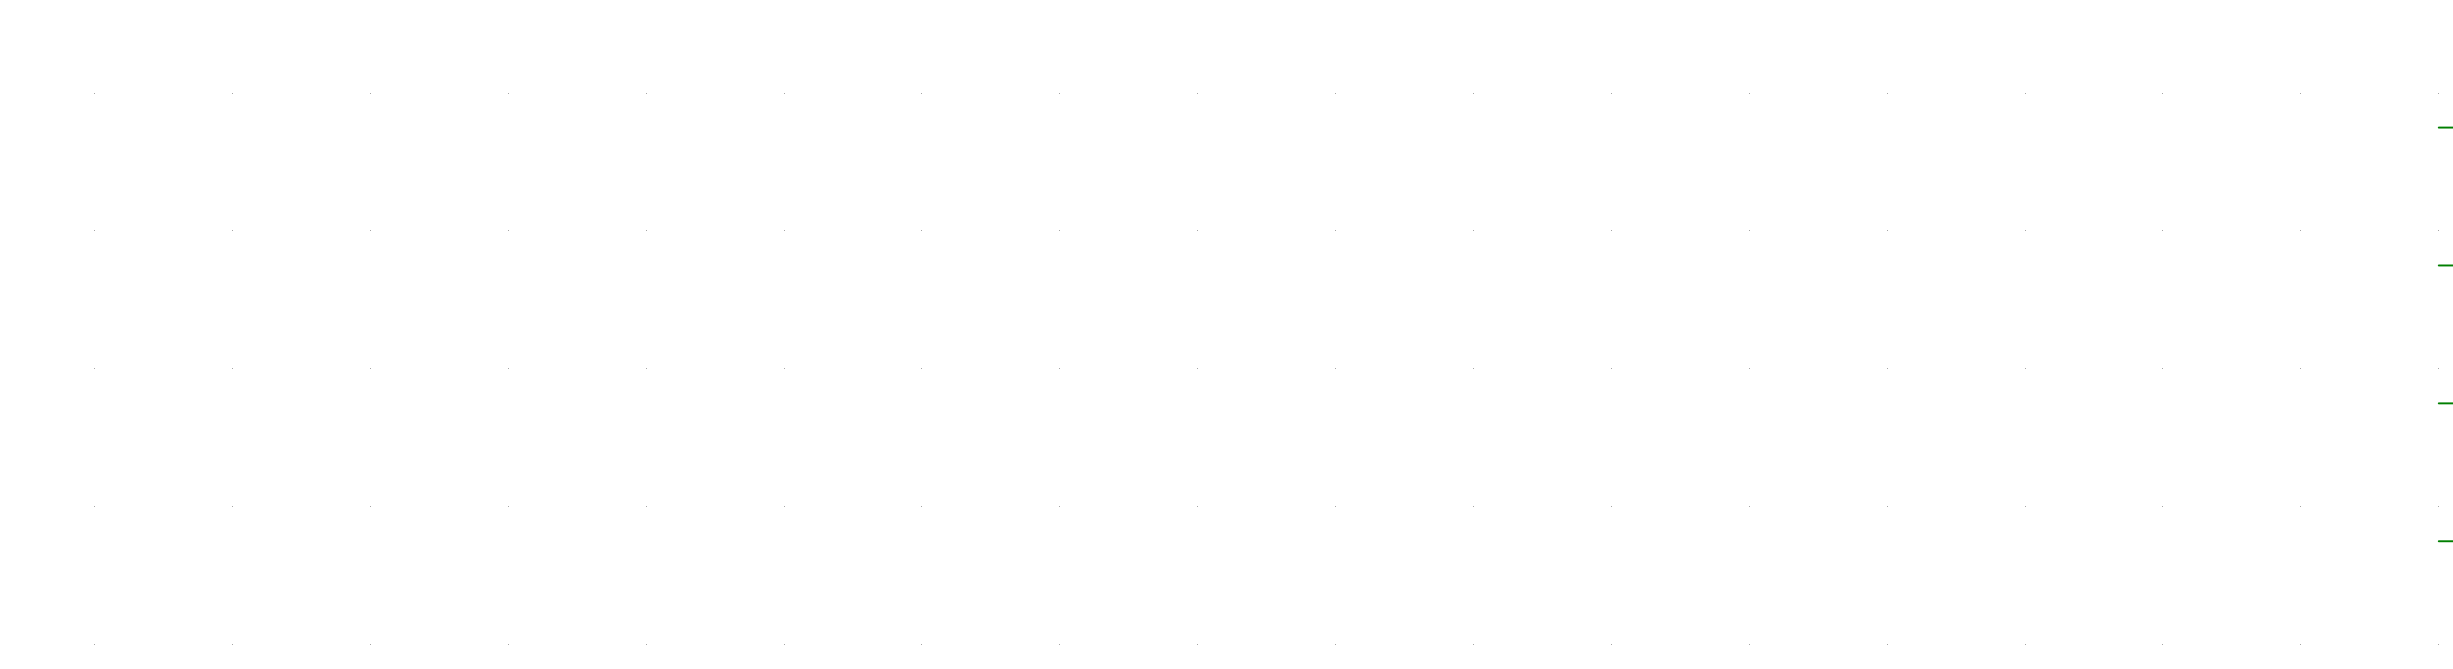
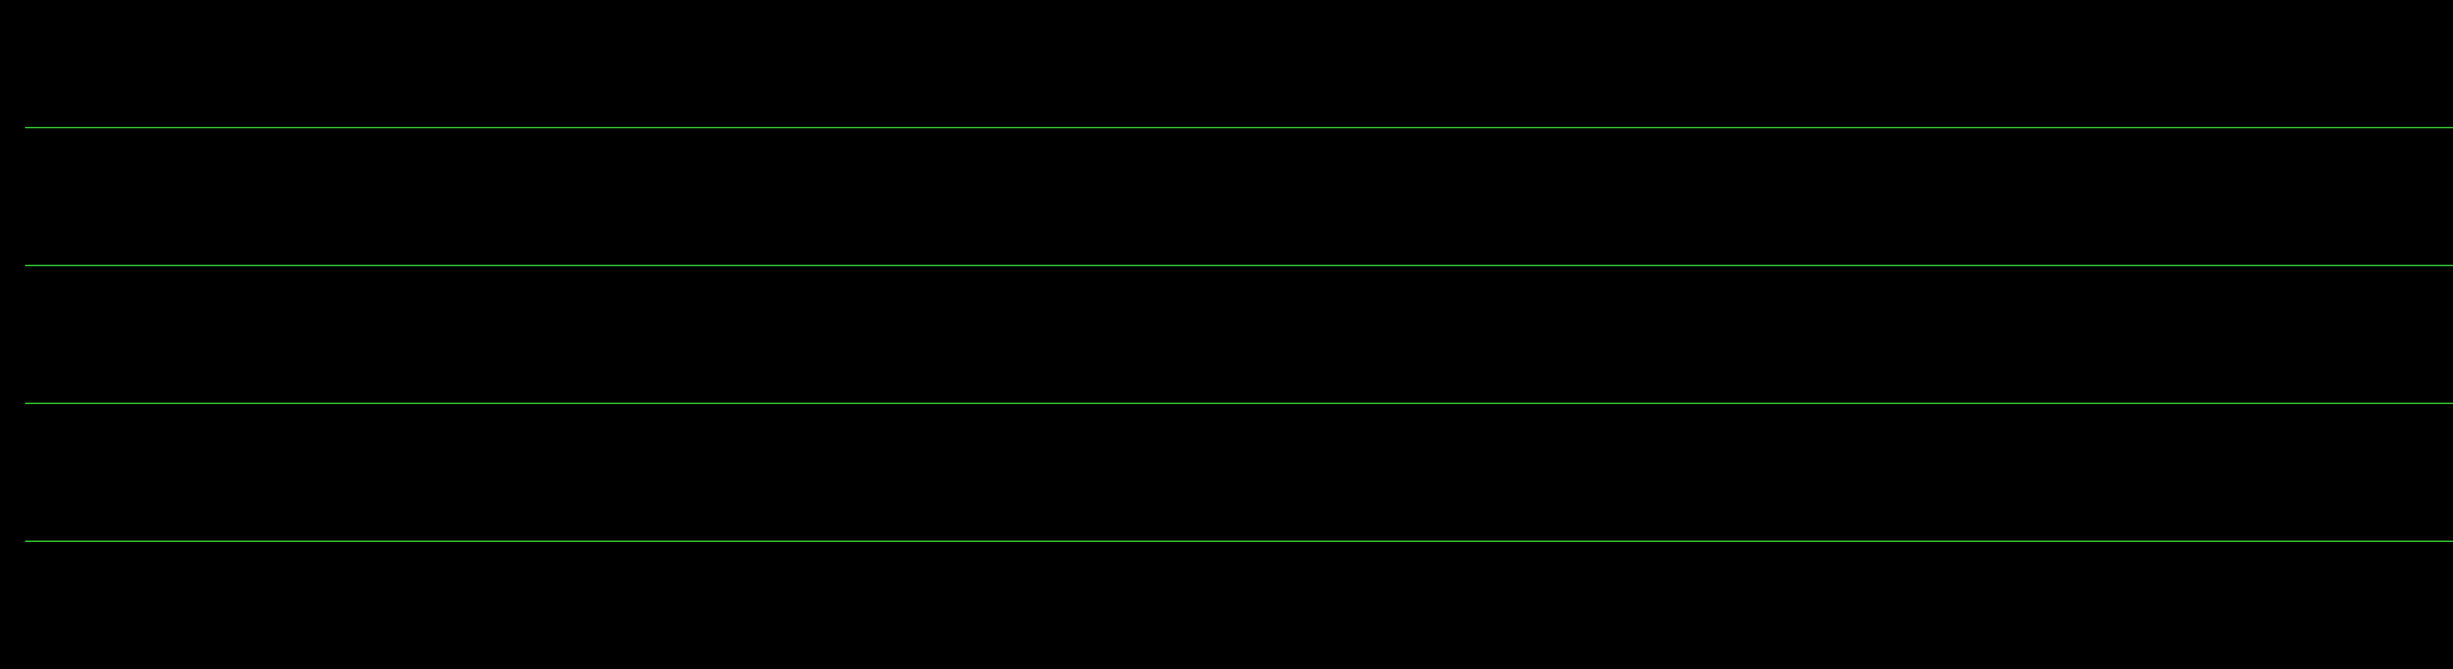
wire: none -> (25, 127) (2438, 127)
wire: none -> (25, 265) (2438, 265)
wire: none -> (25, 403) (2438, 403)
wire: none -> (25, 541) (2438, 541)

